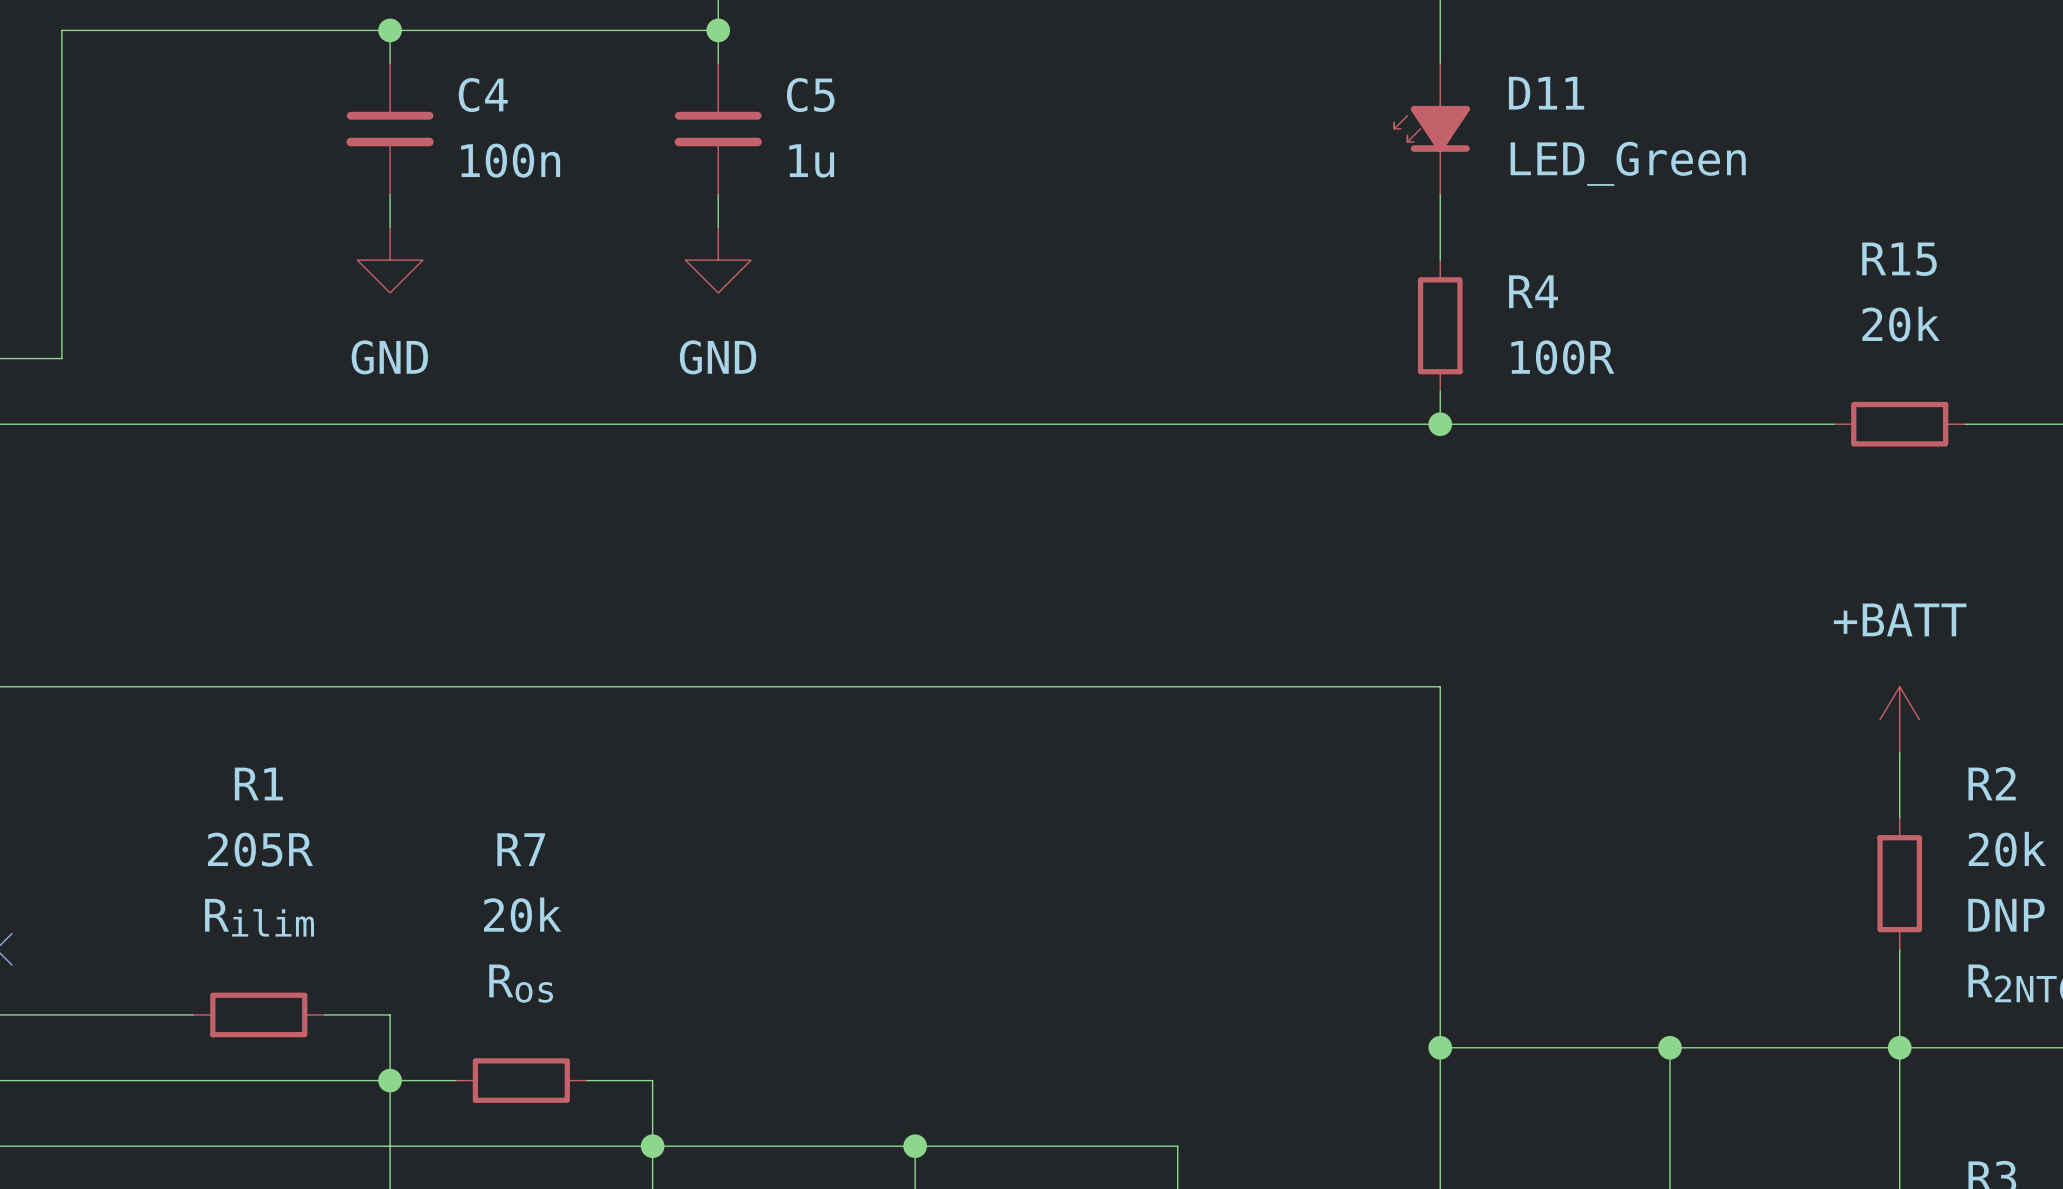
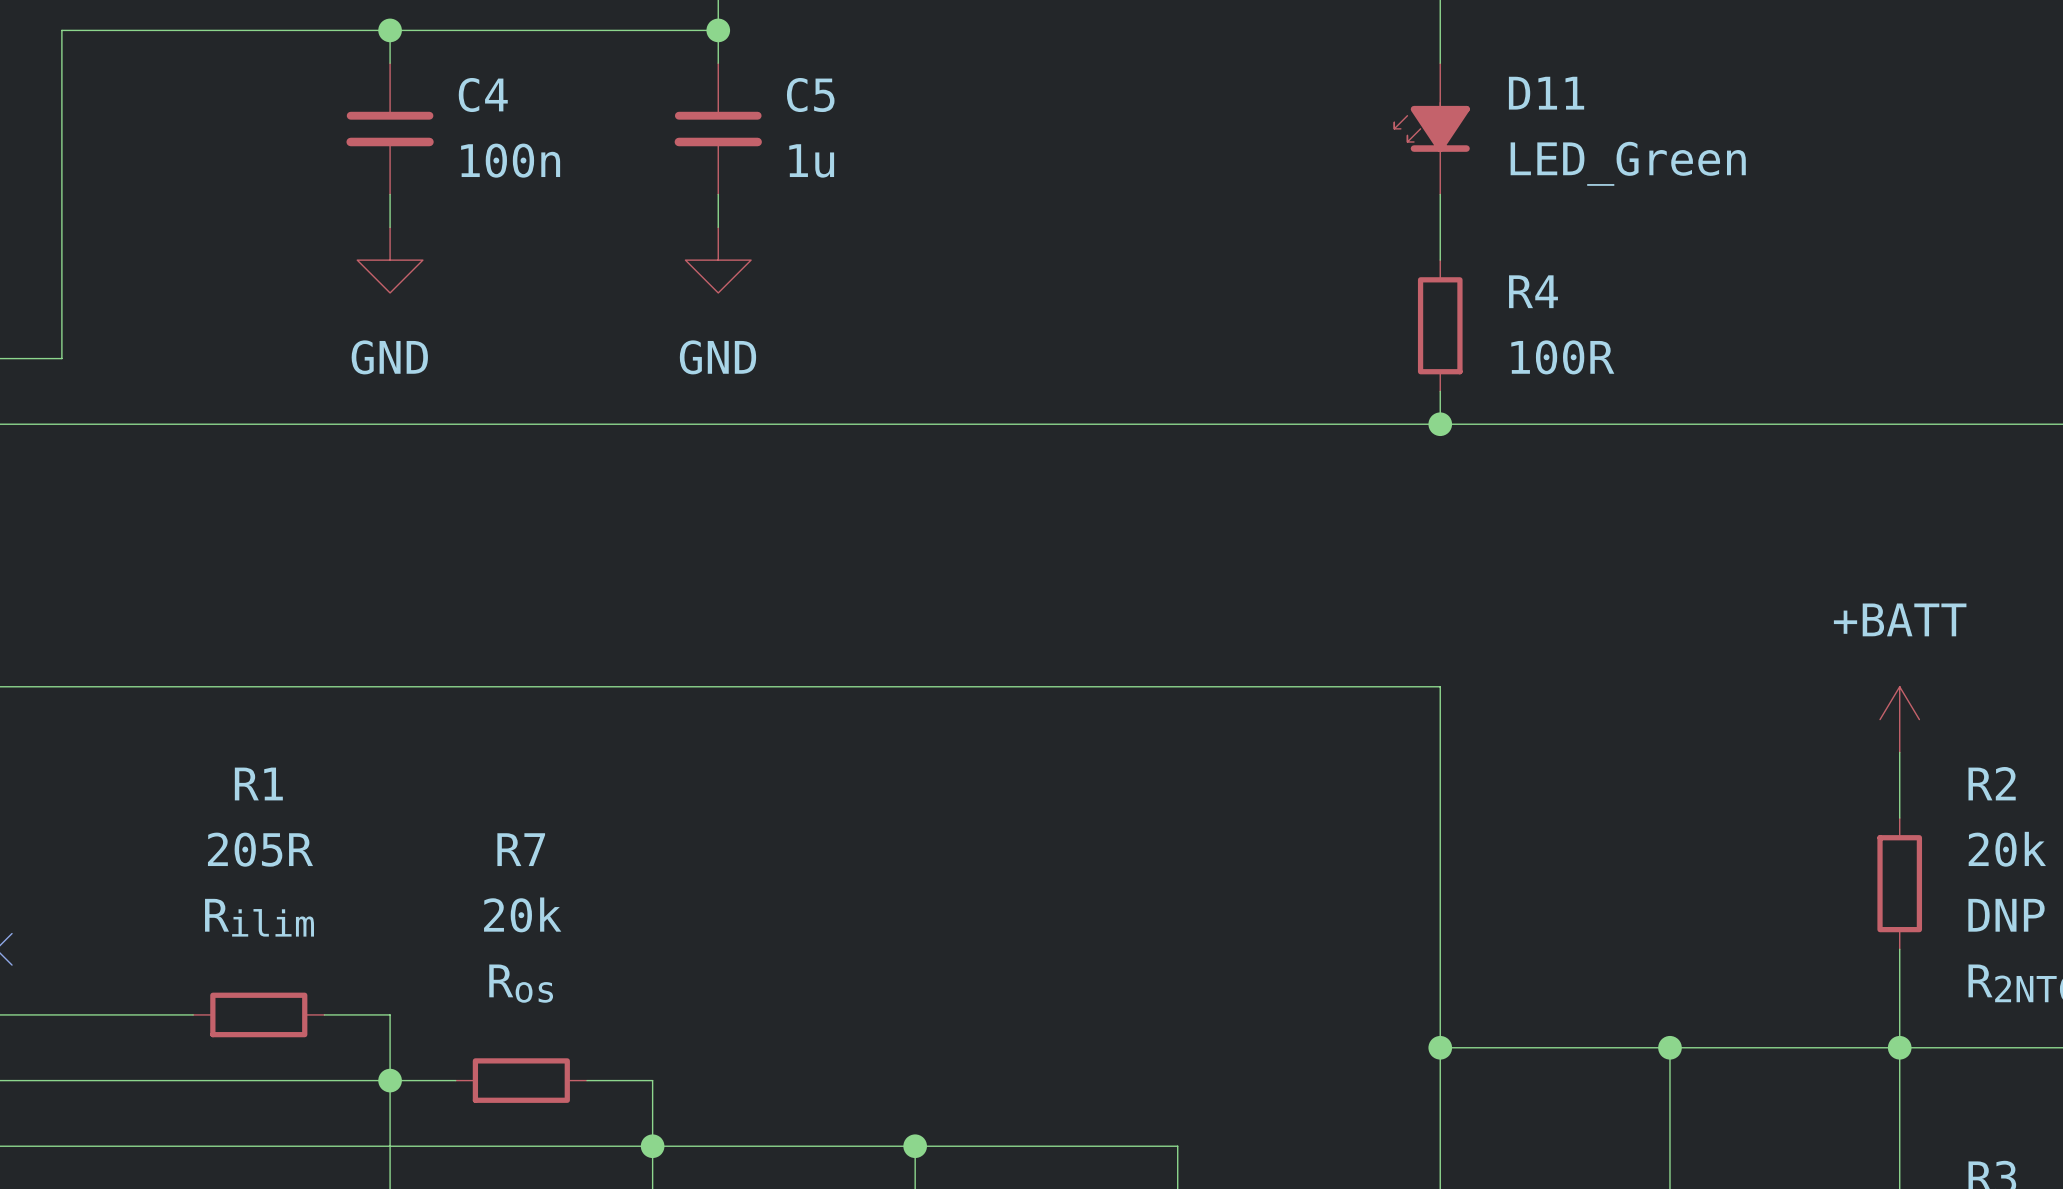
wire: none -> (1834, 424) (1965, 424)
R15: 20k (1899, 424) -> none

